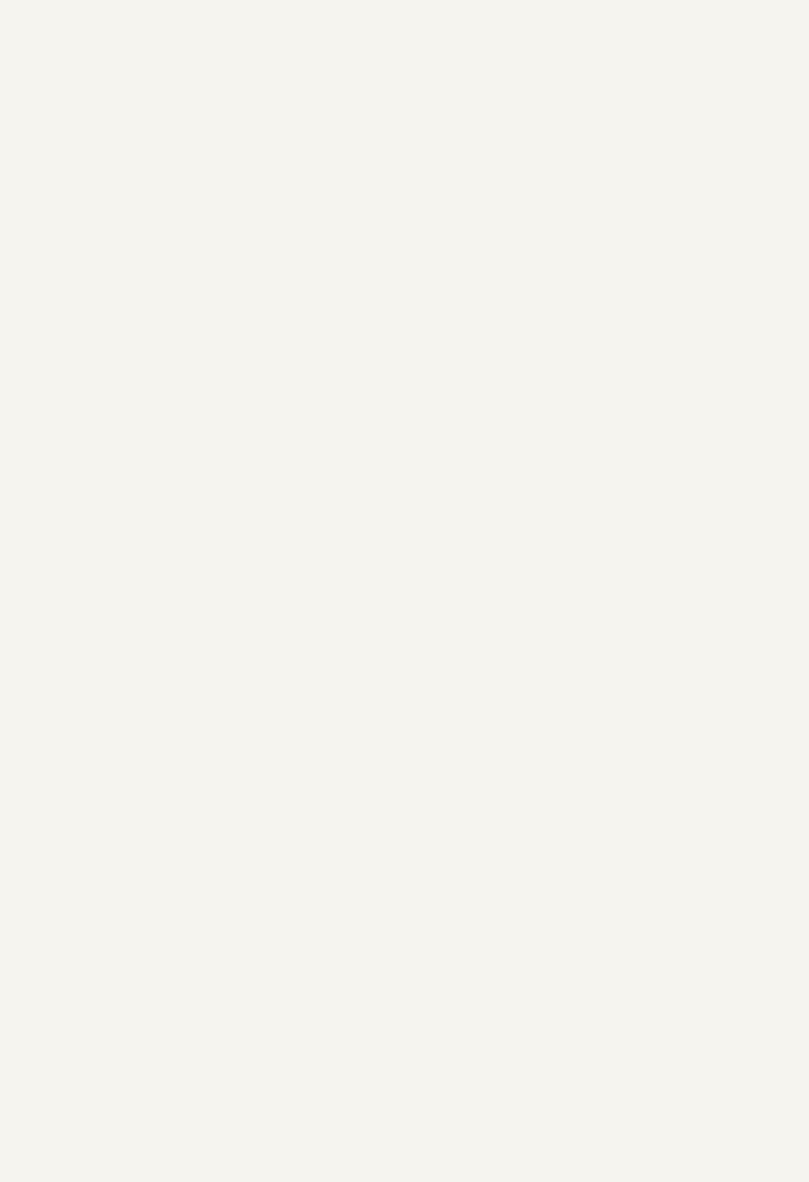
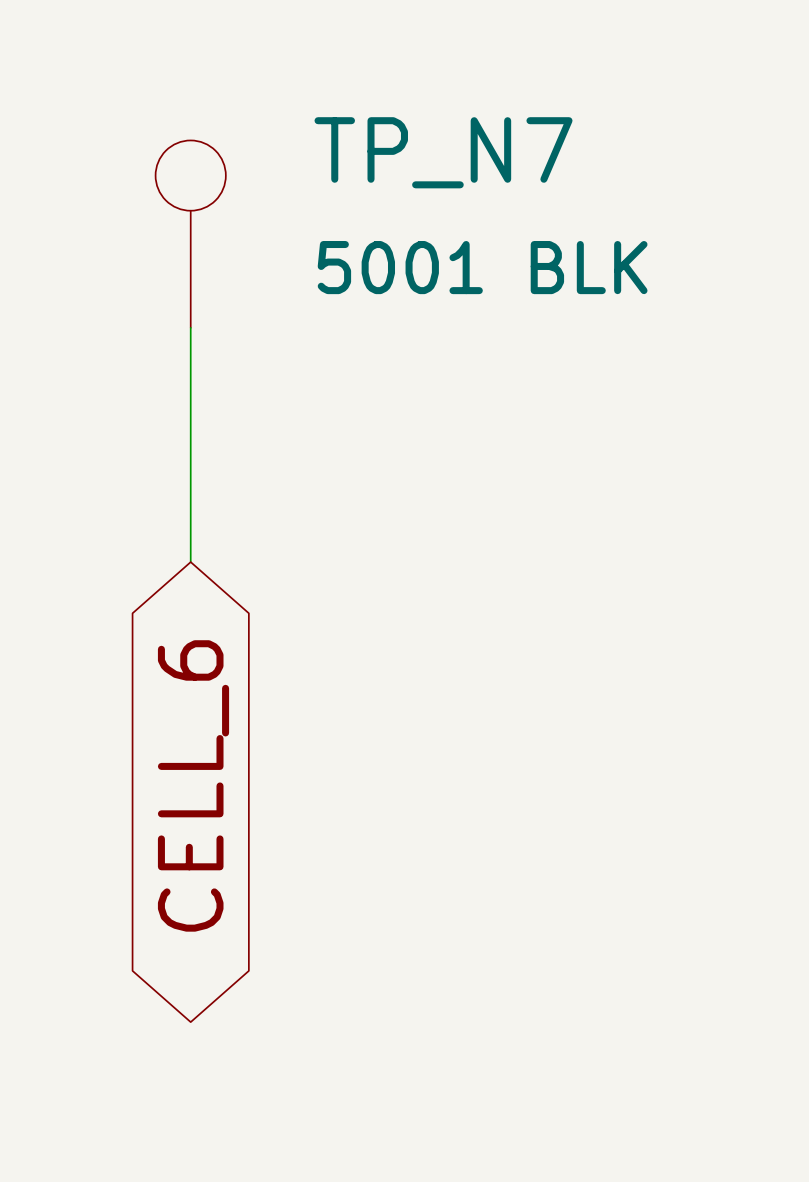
TP_N7: none -> 5001 BLK (190, 234)
wire: none -> (190, 327) (190, 562)
global label: none -> CELL_6 (193, 785)

